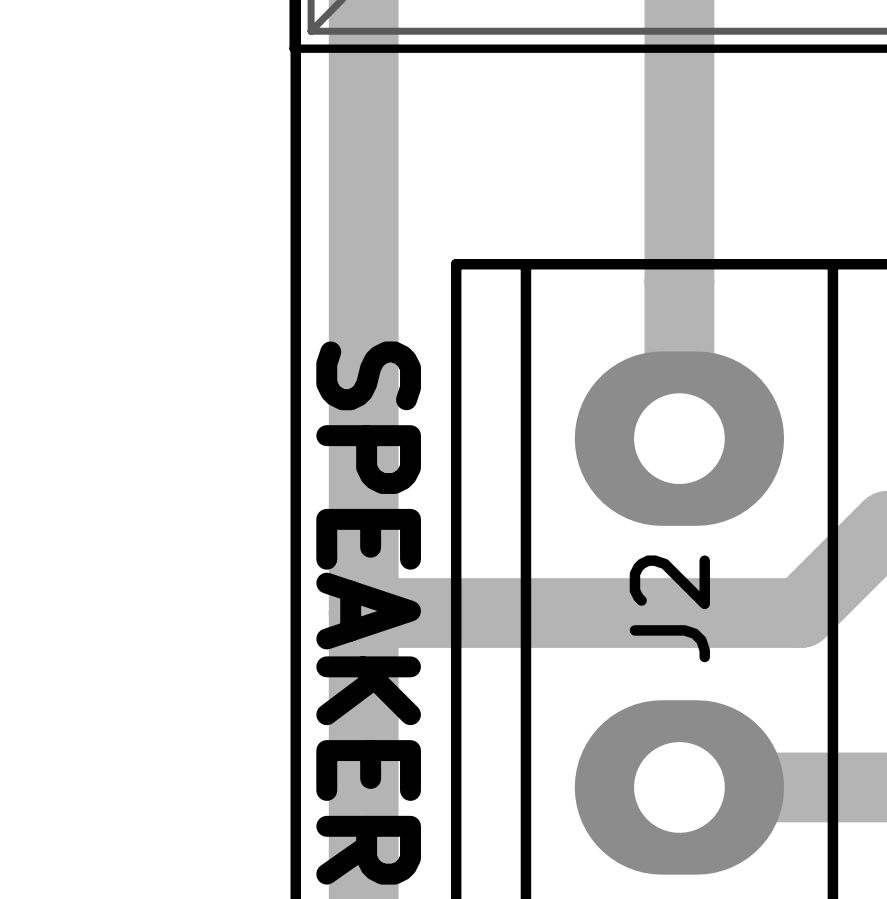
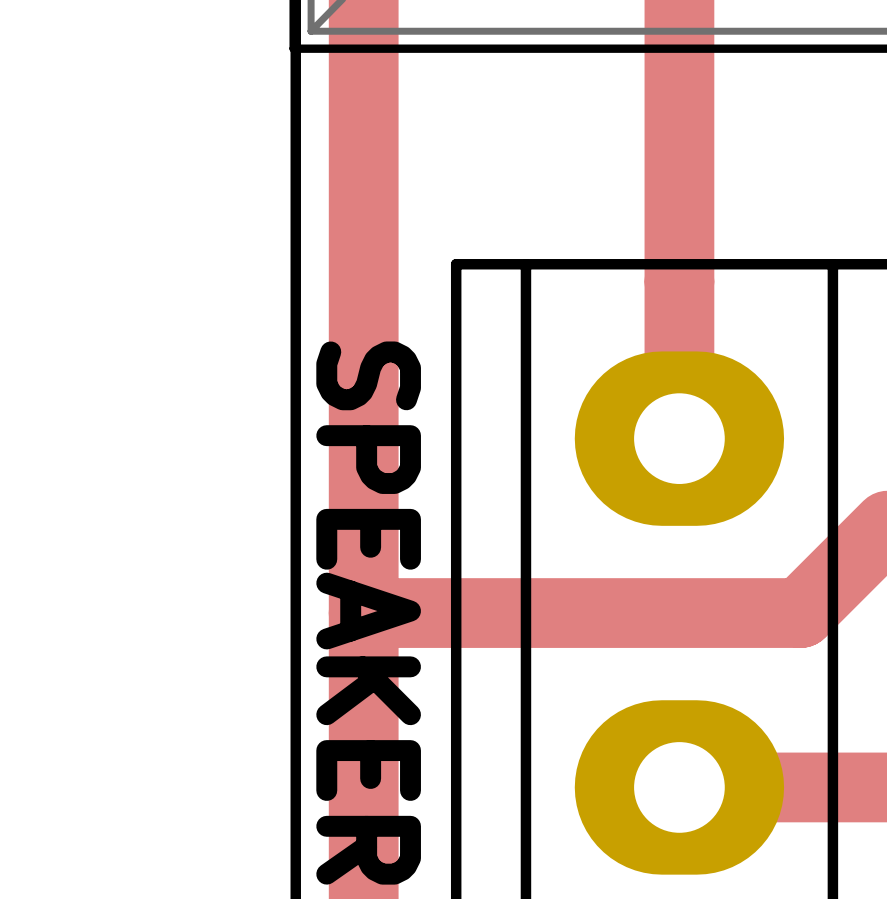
J2 name: J2 (669, 608) -> none

